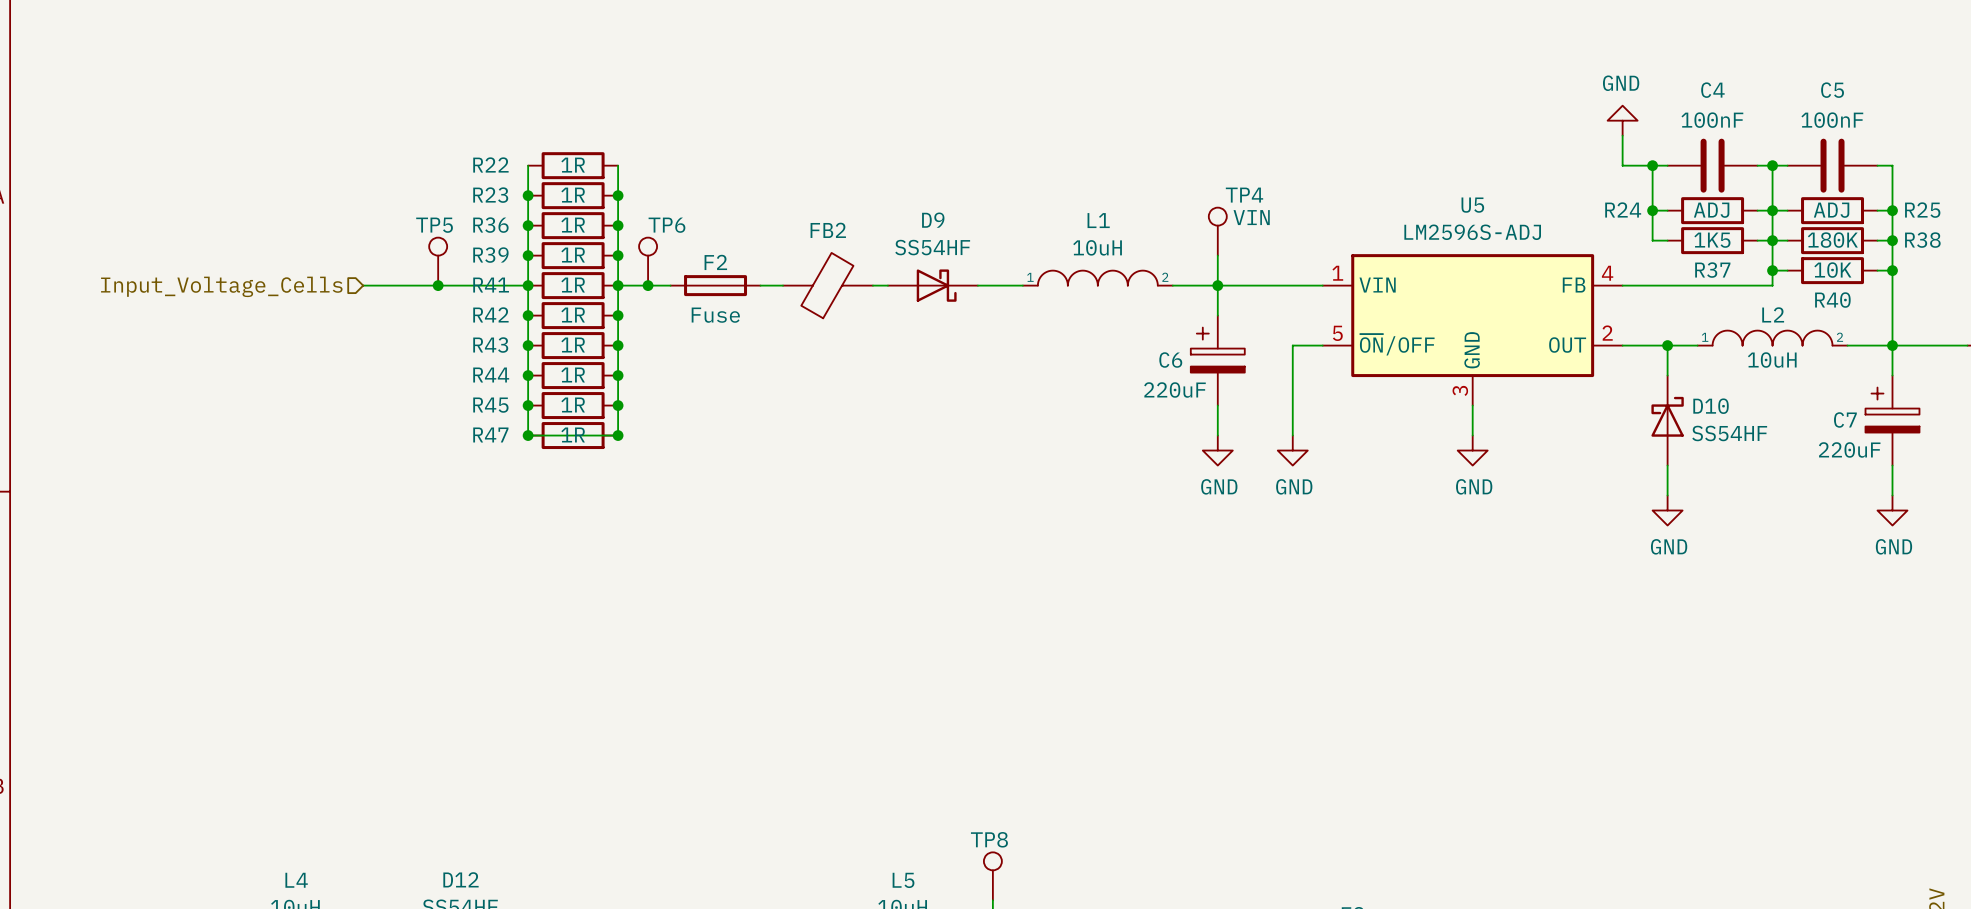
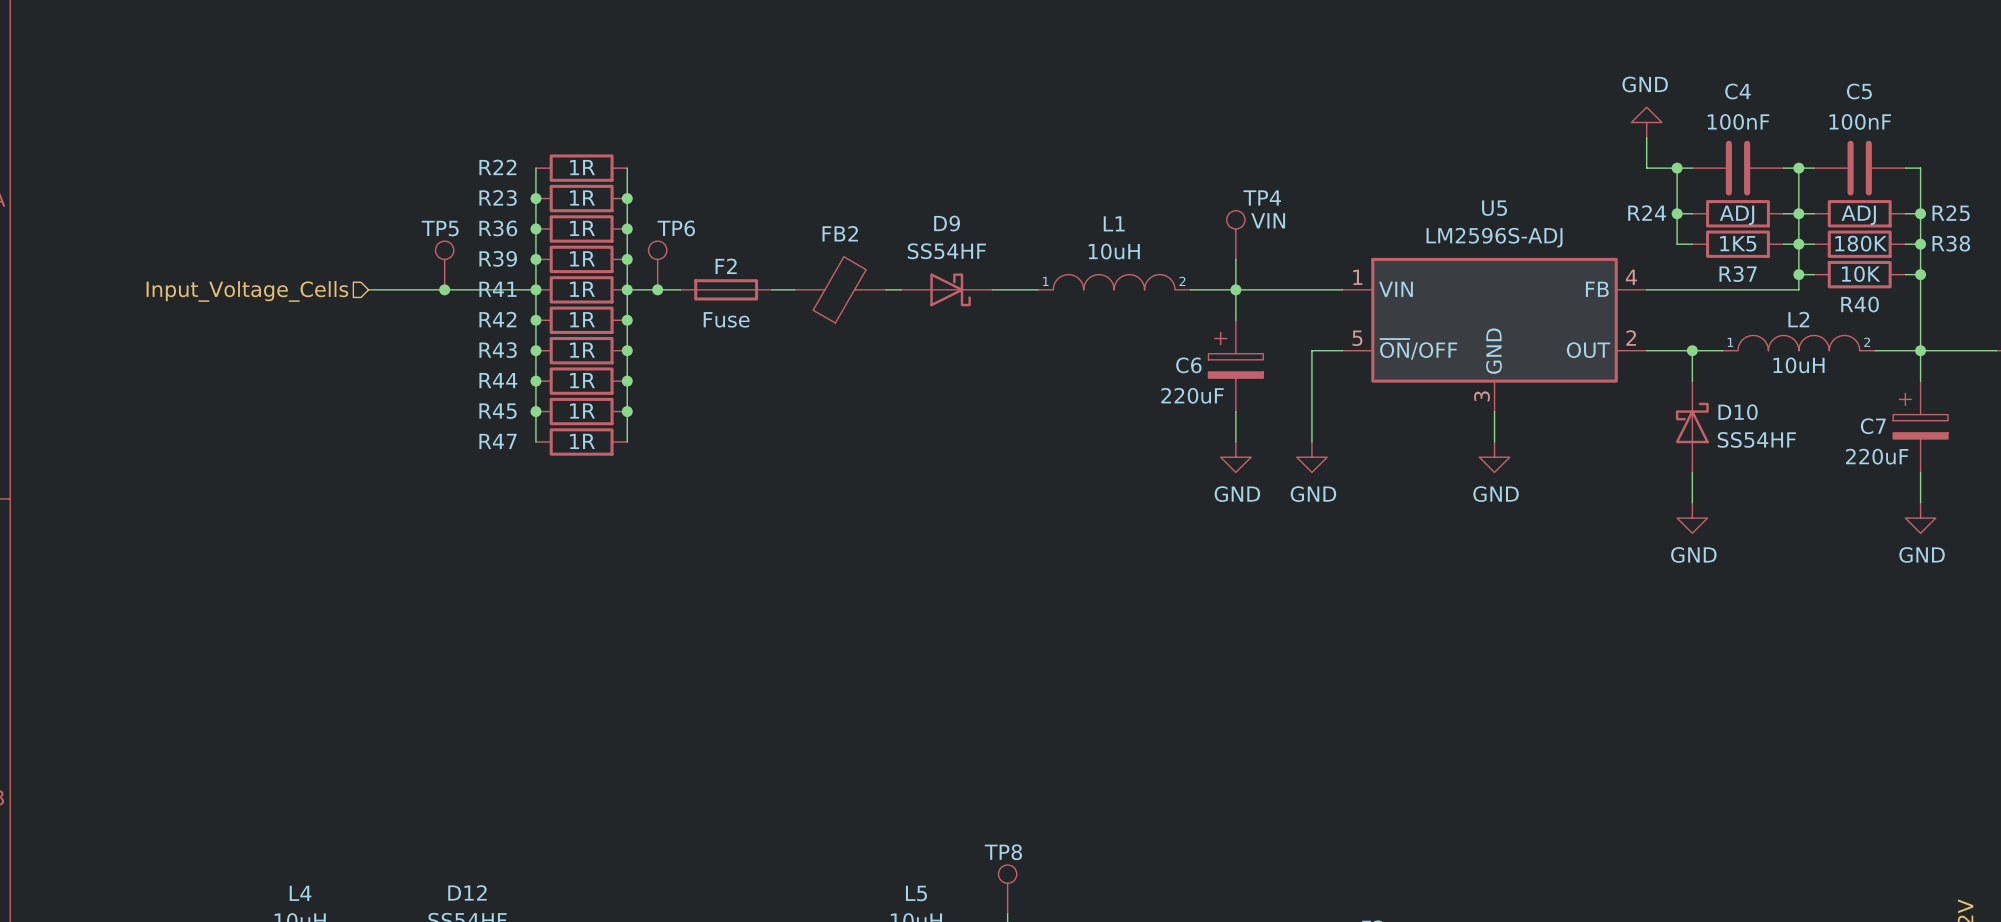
wire: (528, 435) (618, 435) -> none
junction: (528, 435) -> none
junction: (618, 435) -> none

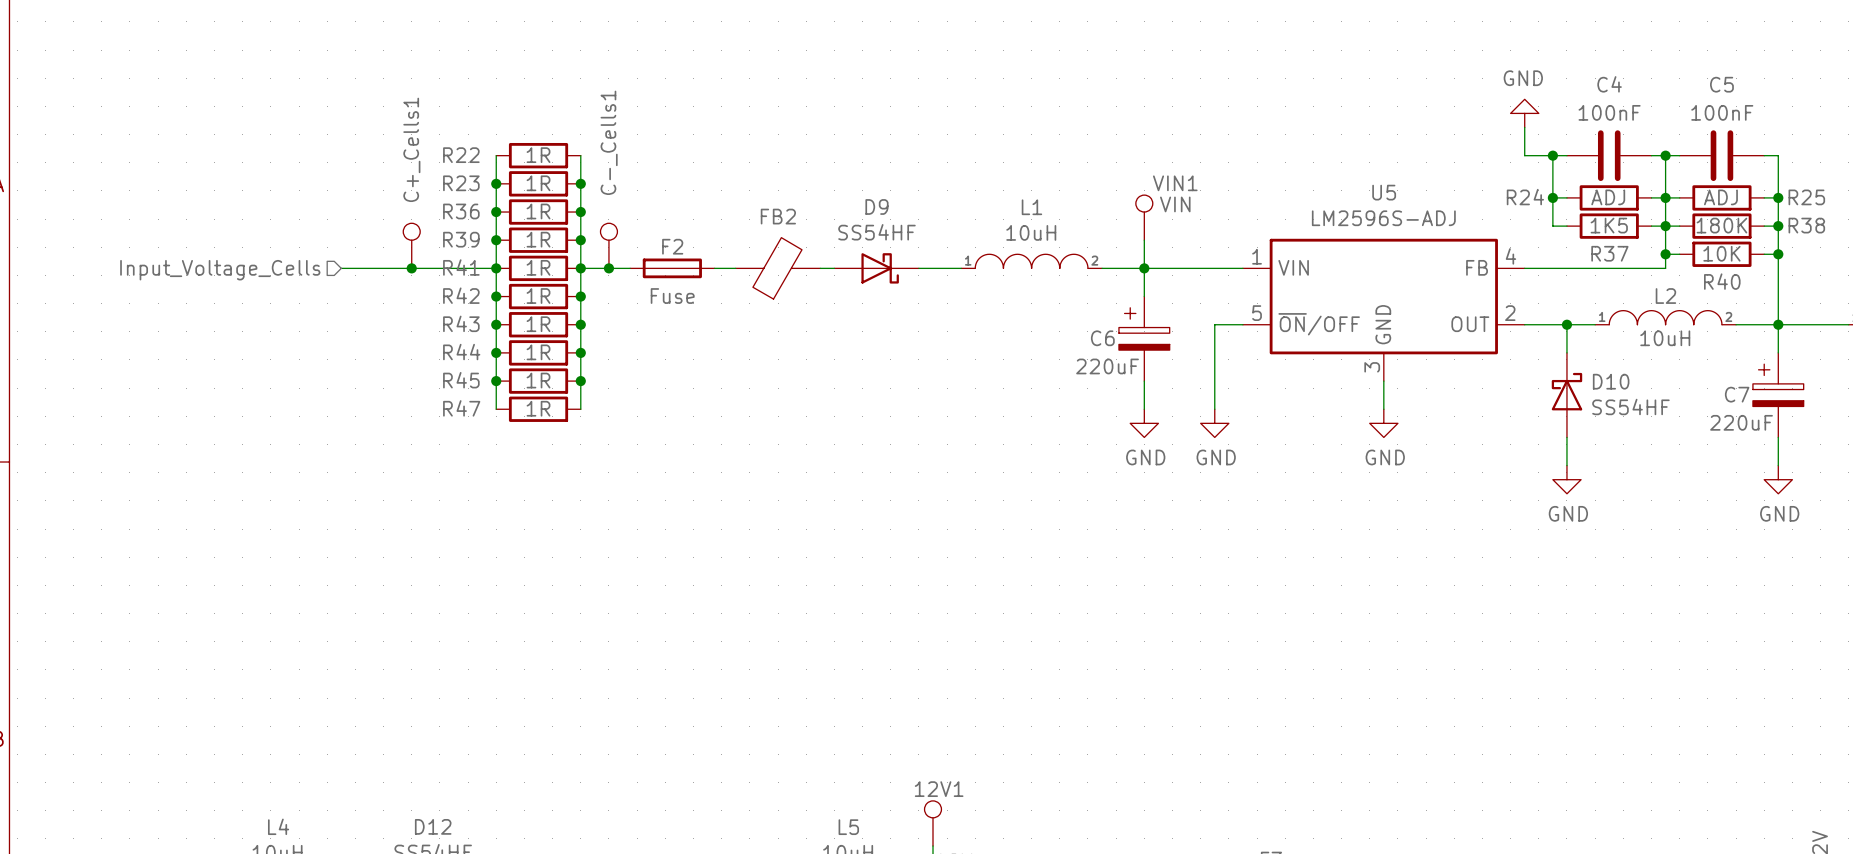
TP4 name: TP4 (1262, 197) -> VIN1 (1175, 183)
TP5 name: TP5 (440, 228) -> C+_Cells1 (411, 149)
TP6 name: TP6 (676, 228) -> C-_Cells1 (609, 142)
TP8 name: TP8 (1003, 852) -> 12V1 (939, 789)

